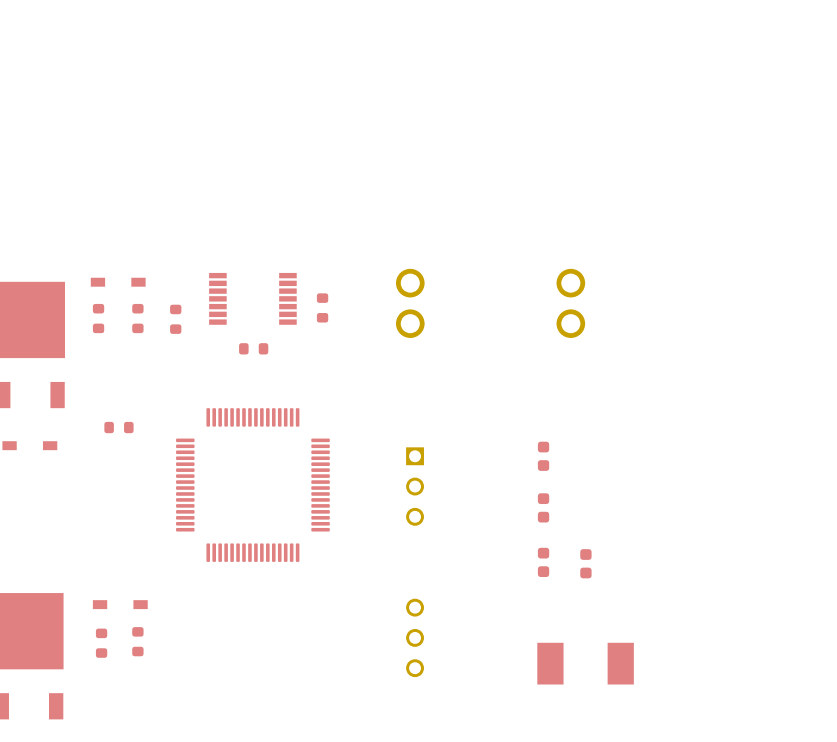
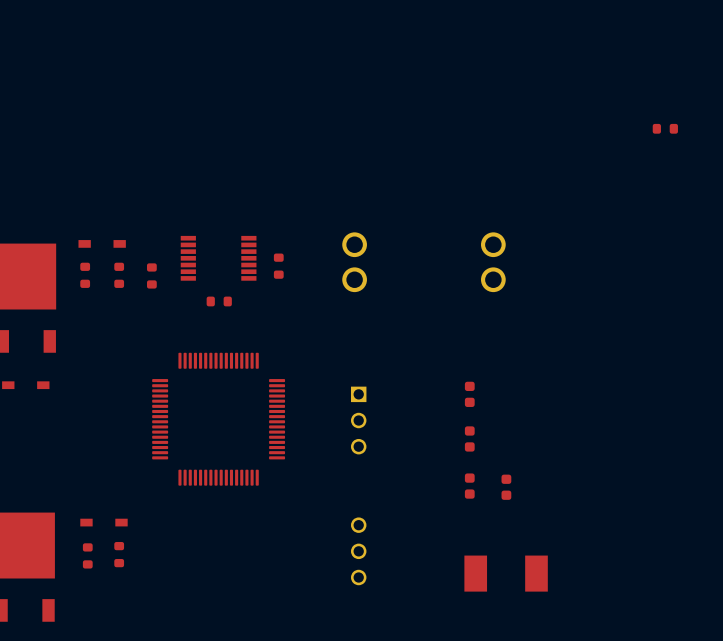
part: none -> (665, 128)
part: (118, 427) -> none

